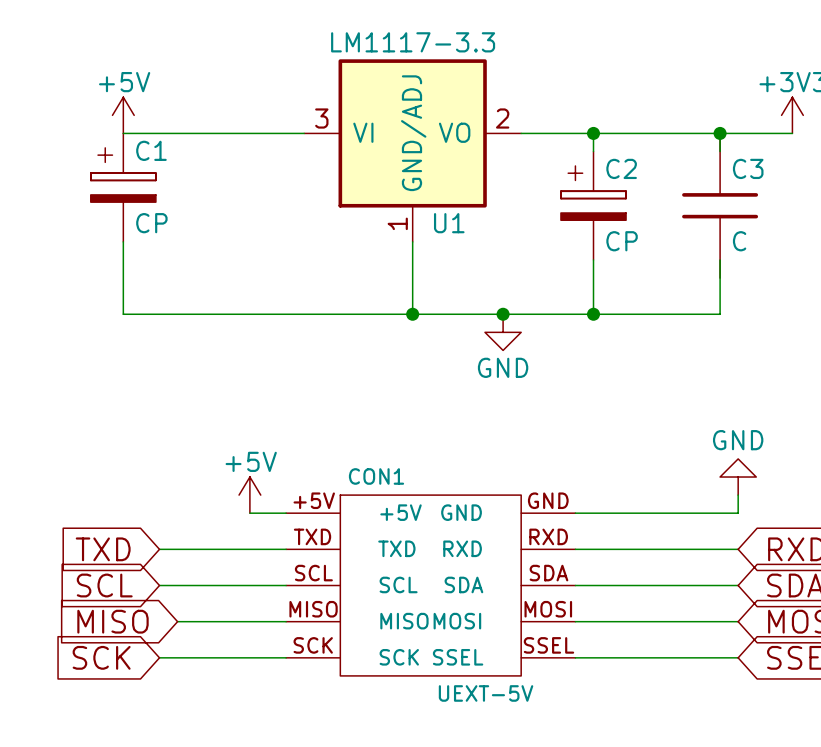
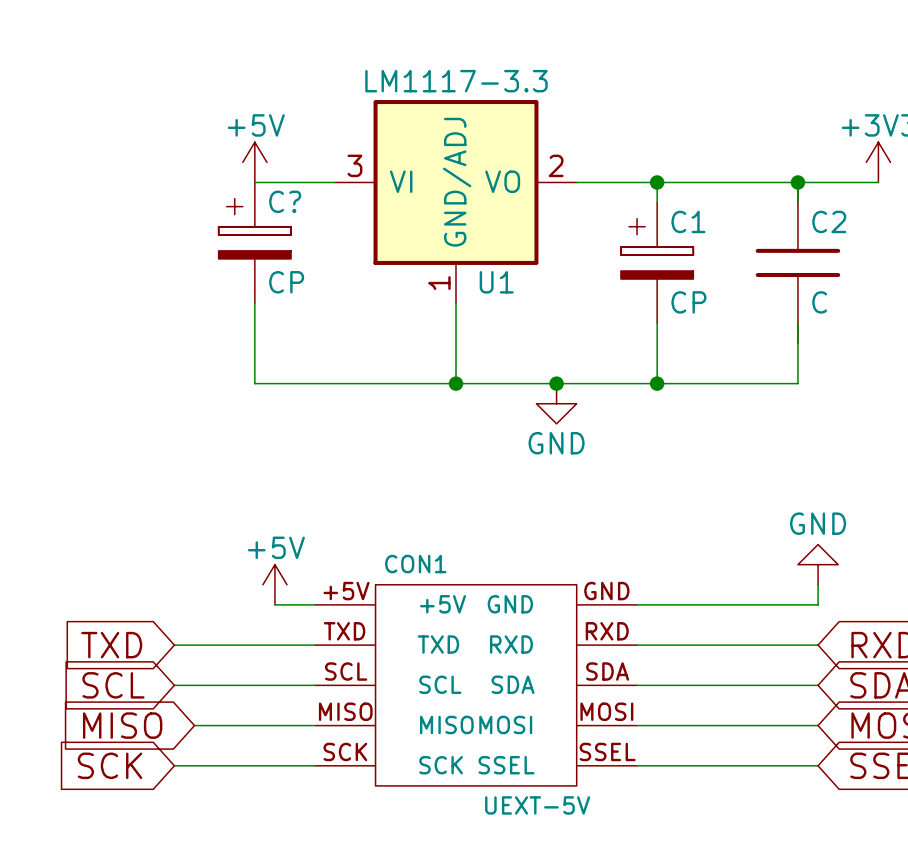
power symbol position: +5V (123, 115) -> +5V (254, 162)
wire: (123, 133) (231, 133) -> none
C2 name: C2 (621, 168) -> C1 (688, 221)
C3 name: C3 (748, 168) -> C2 (829, 221)
C1: CP (123, 187) -> none
C?: none -> CP (254, 242)
wire: (123, 241) (123, 314) (231, 314) -> (254, 303) (254, 383)

